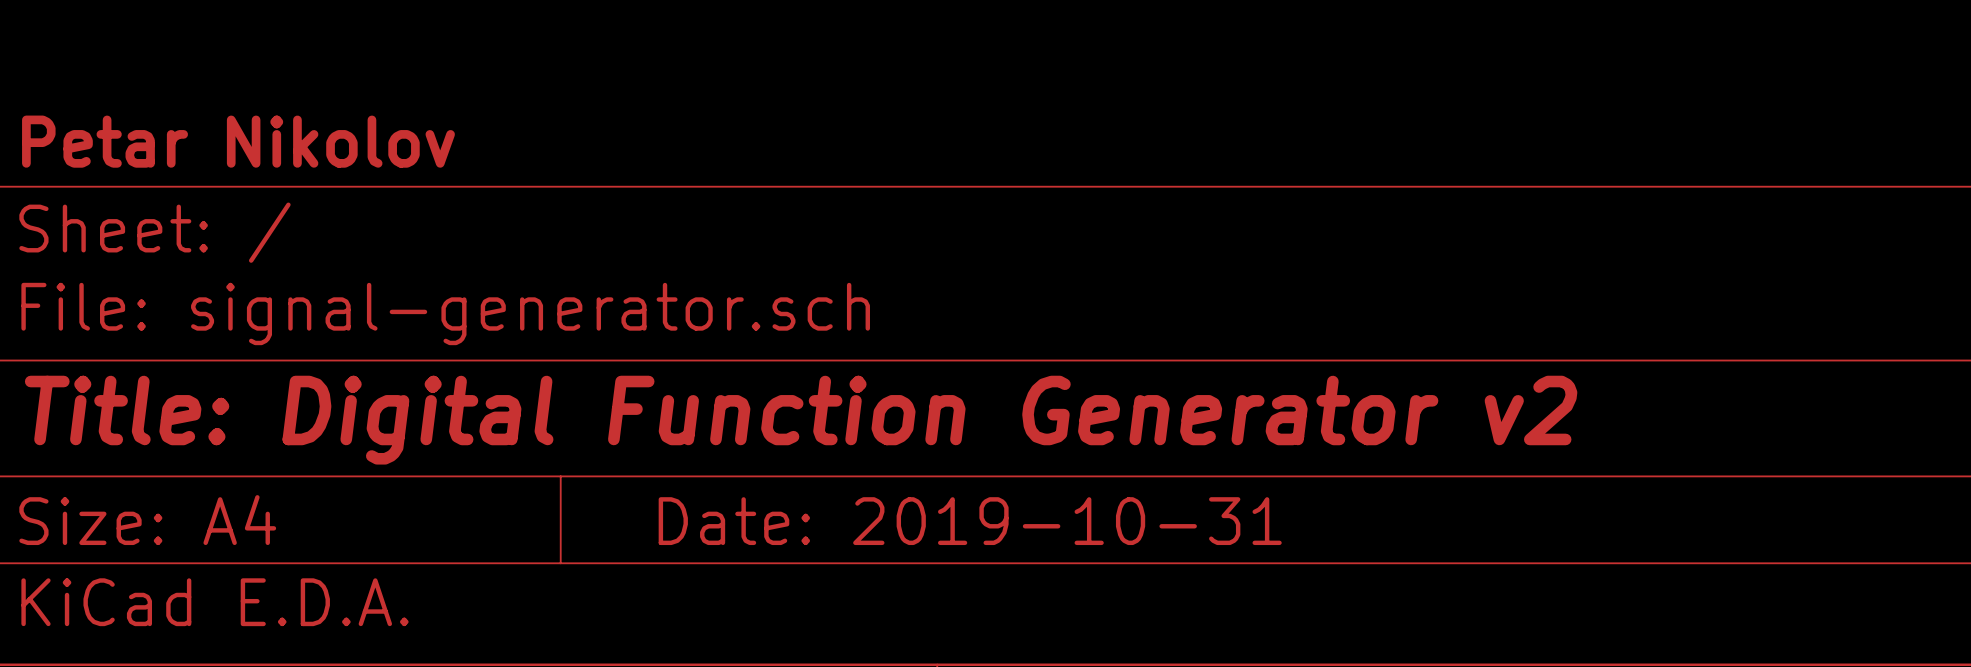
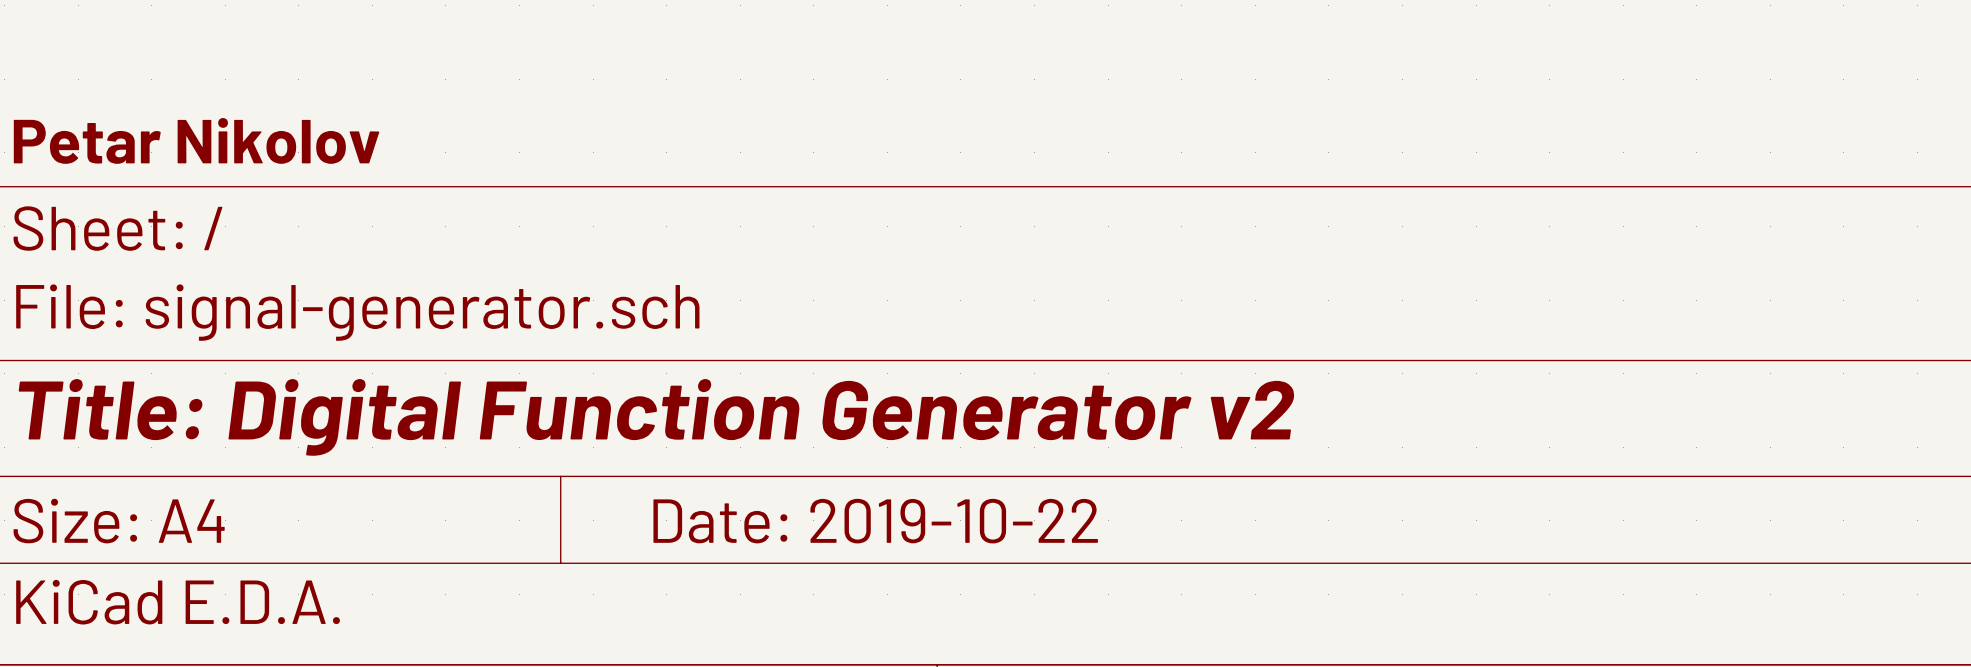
title block: Date: 2019-10-31 (970, 521) -> Date: 2019-10-22 (875, 521)

